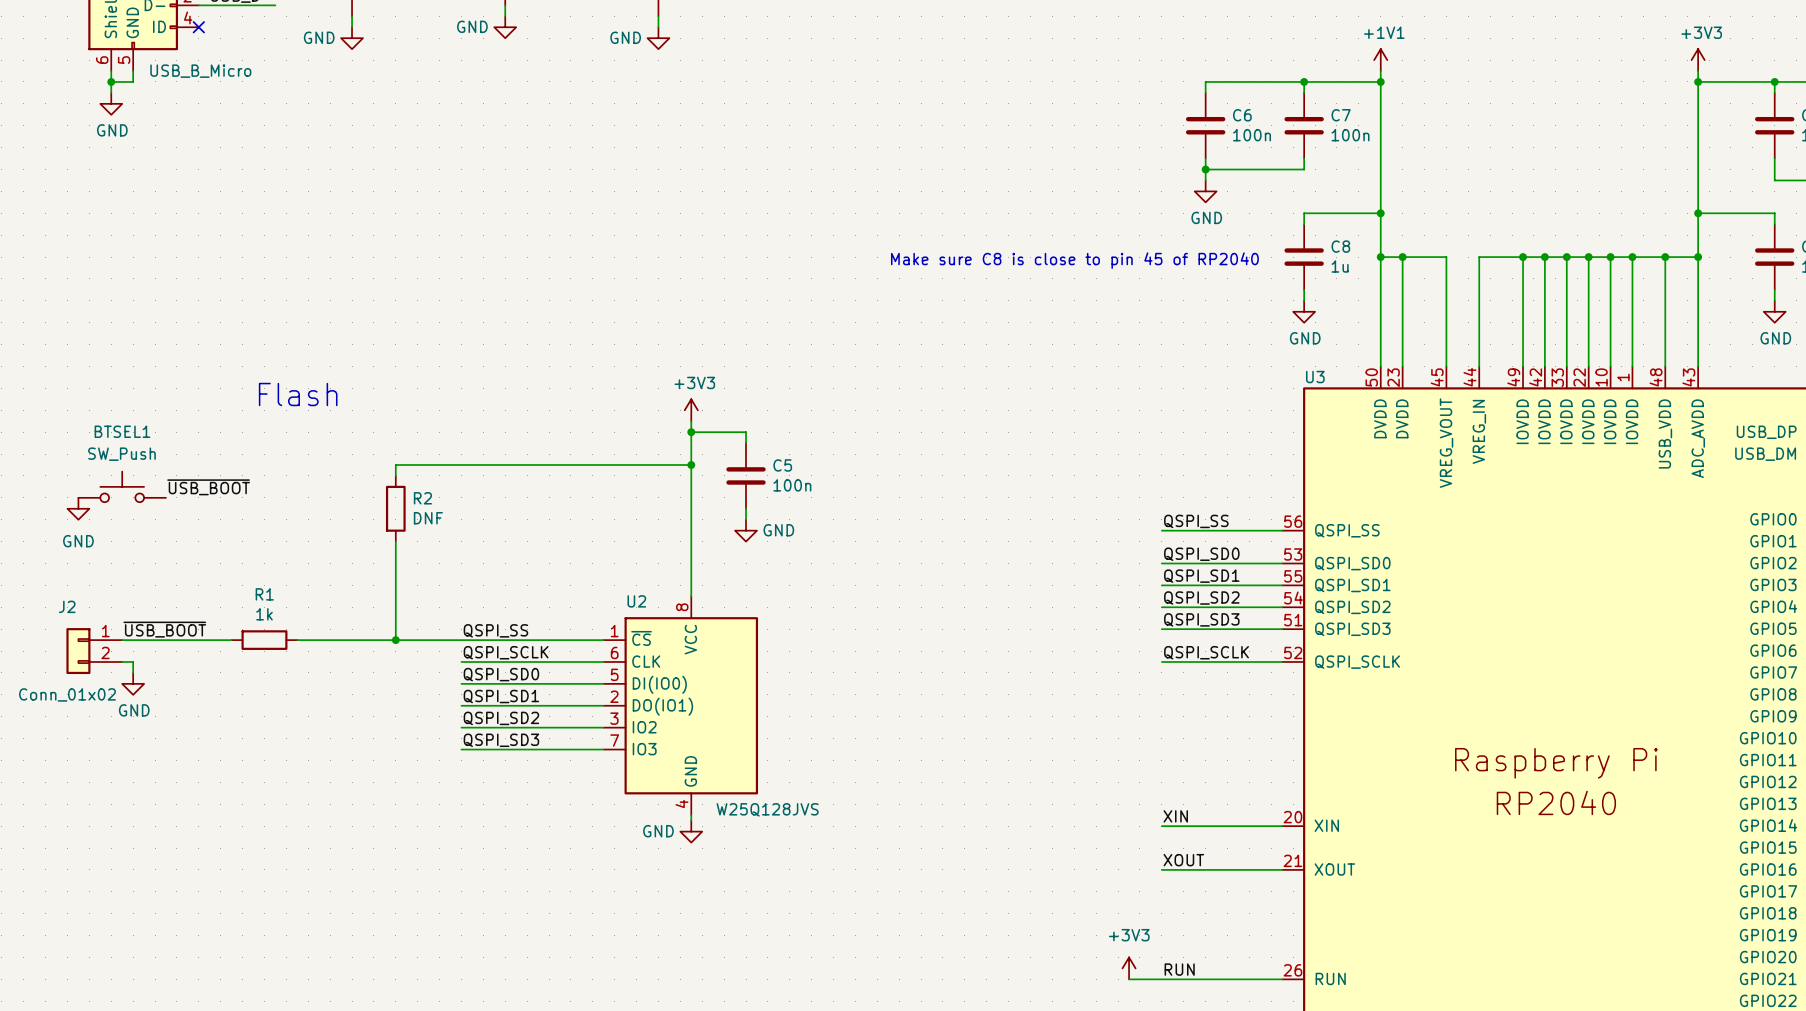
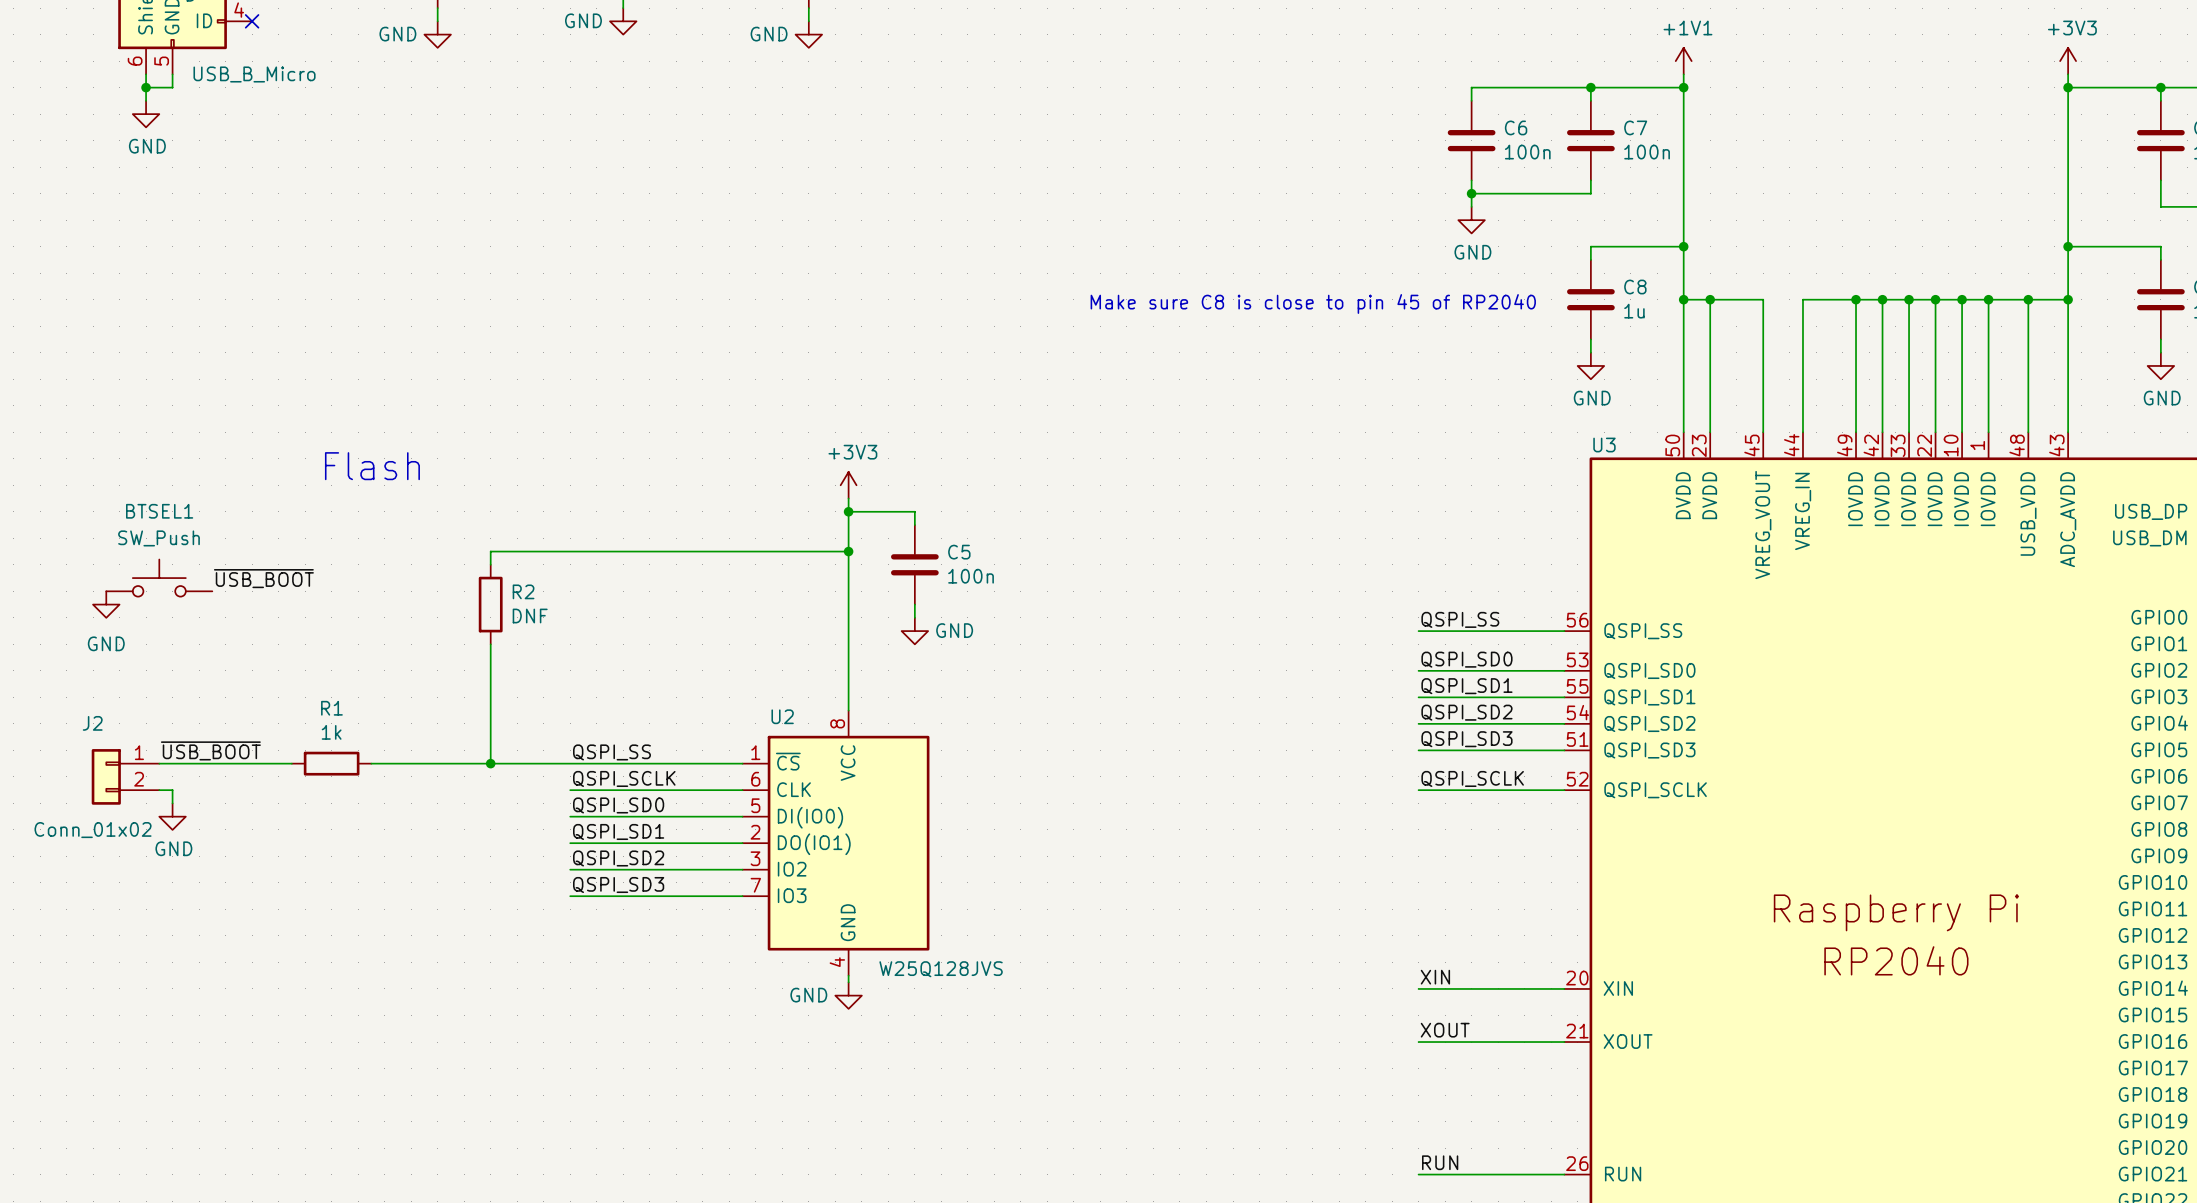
power symbol: +3V3 (1129, 968) -> none
wire: (1129, 979) (1161, 979) -> none

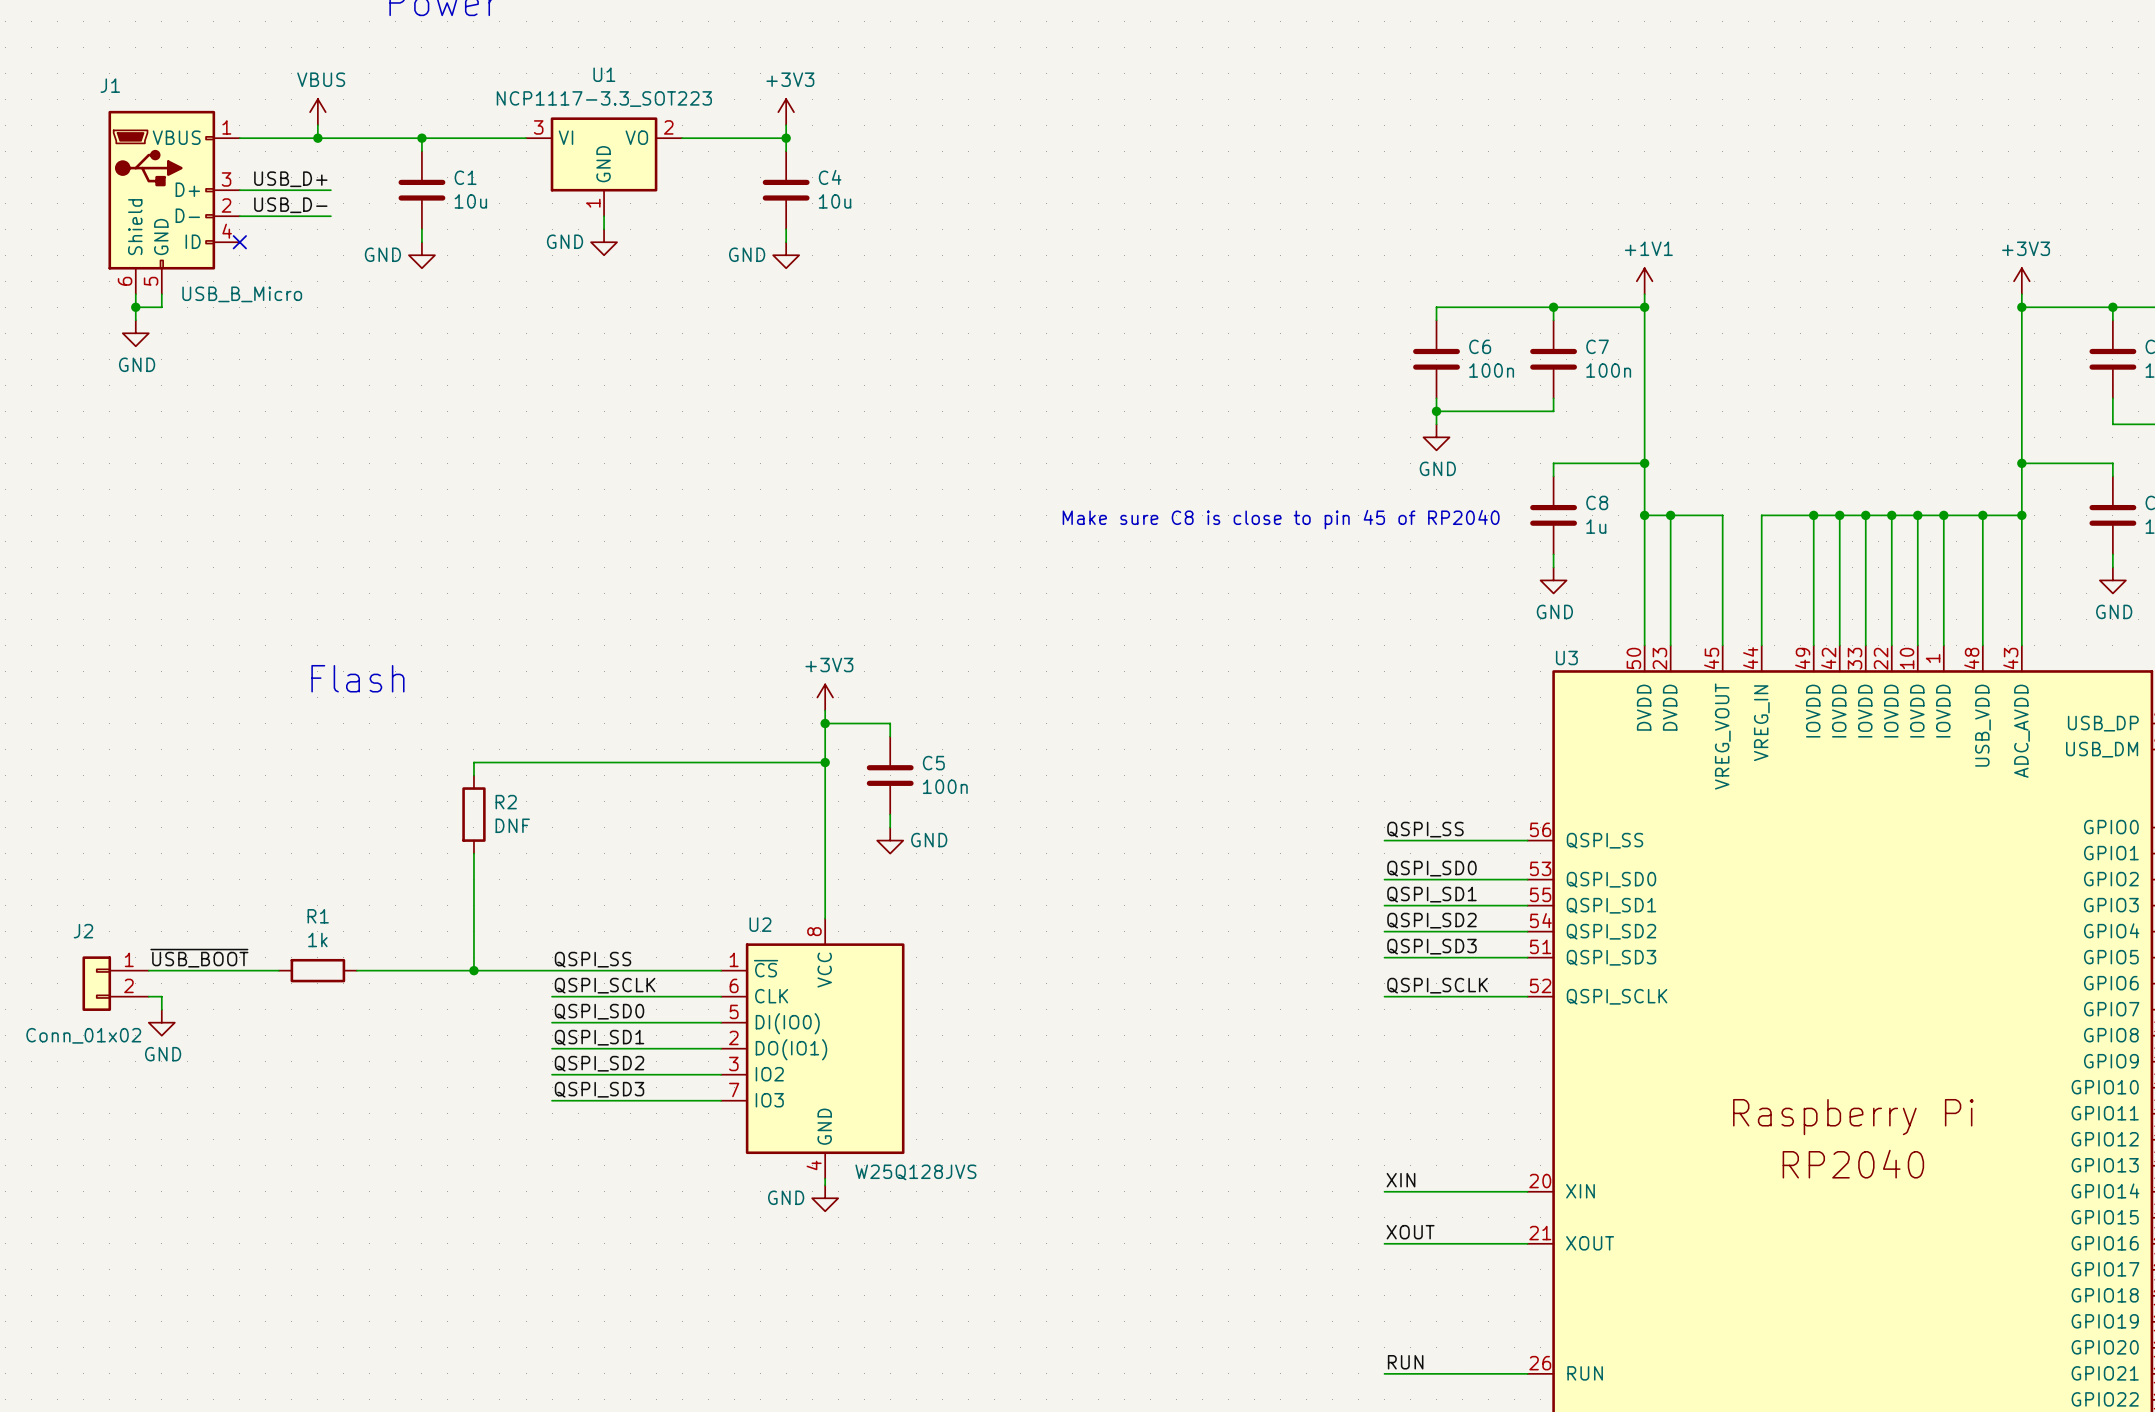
BTSEL1: SW_Push (159, 578) -> none
label: ~{USB_BOOT} (263, 578) -> none
power symbol: GND (106, 604) -> none

